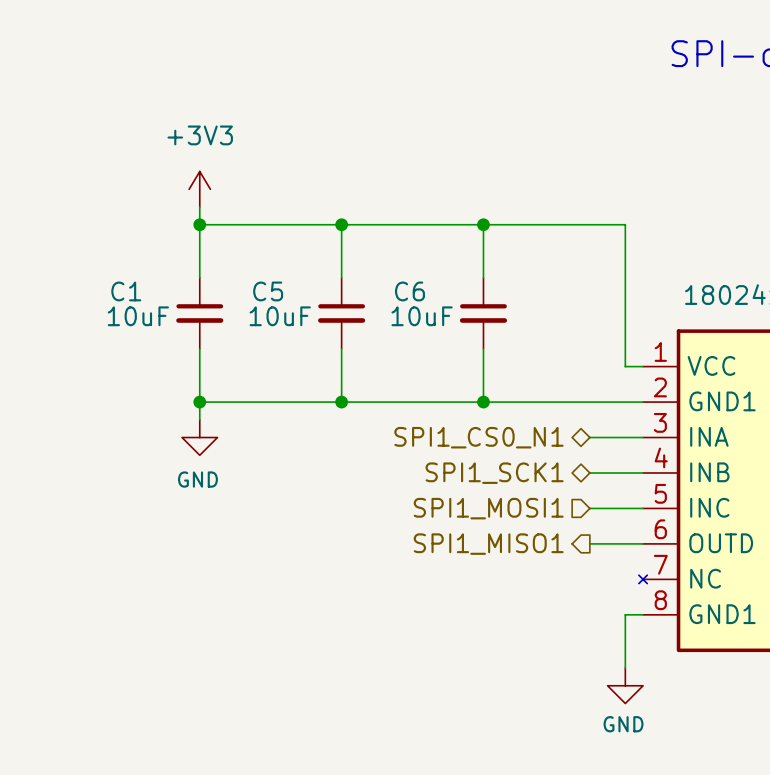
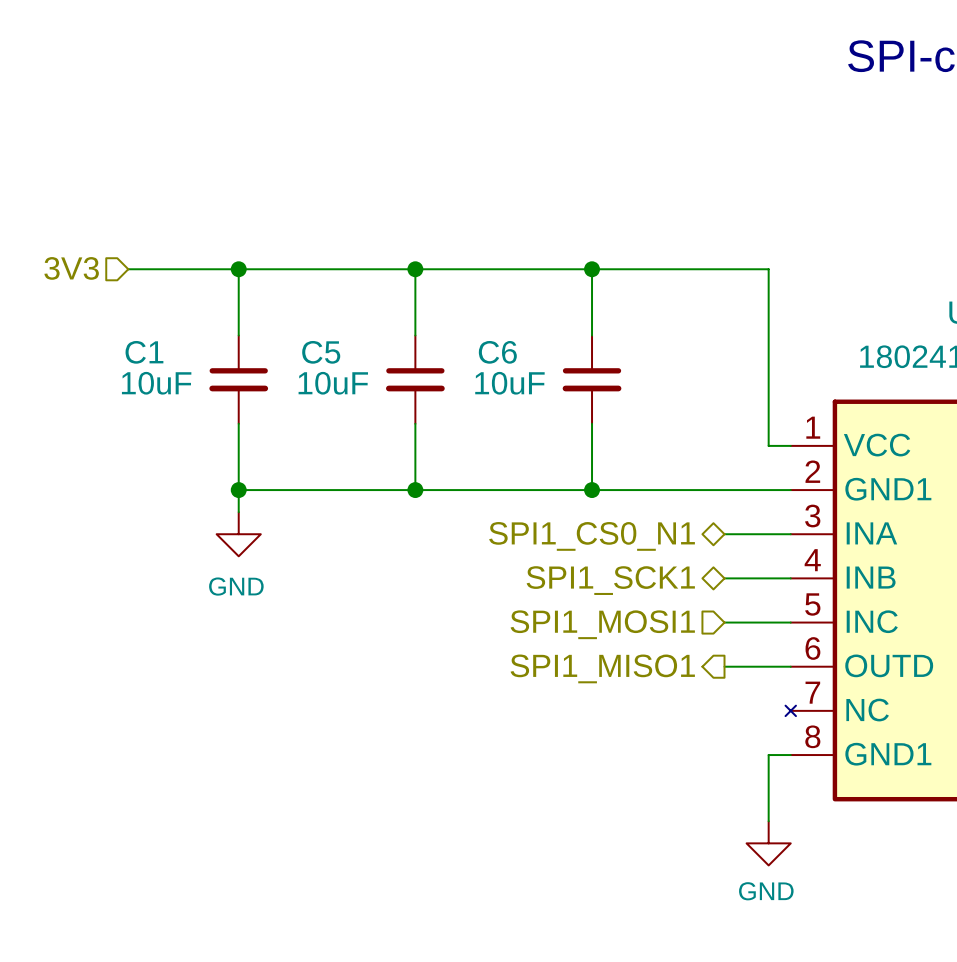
power symbol: +3V3 (199, 189) -> none
wire: (199, 207) (199, 224) -> (128, 269) (238, 269)
hierarchical label: none -> 3V3 (71, 268)

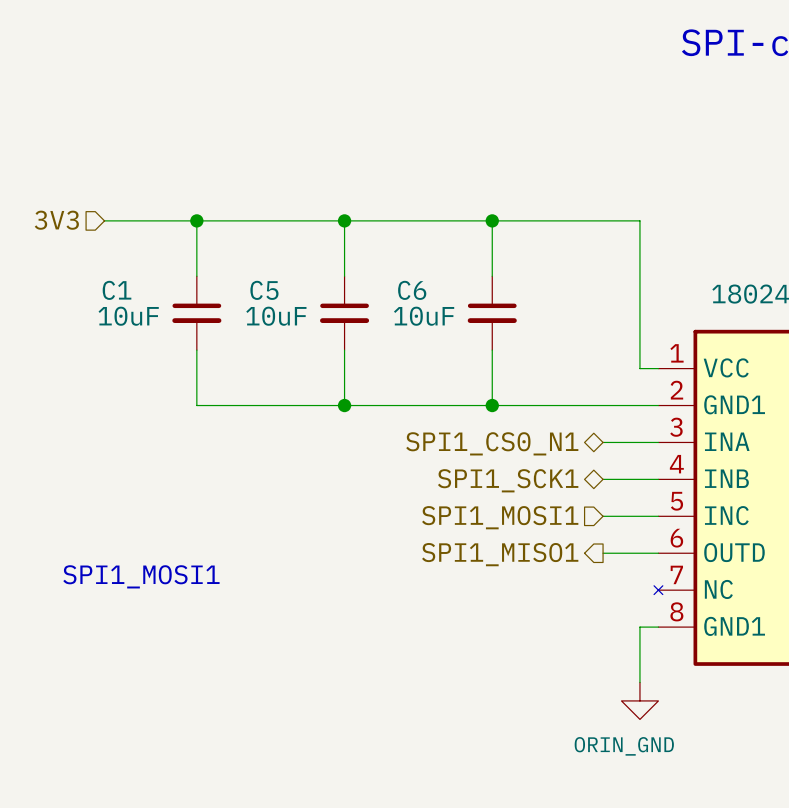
wire: (238, 490) (238, 512) -> none
junction: (238, 490) -> none
power symbol: GND (238, 534) -> none
text: none -> SPI1_MOSI1 (141, 576)
power symbol: GND (768, 843) -> ORIN_GND (639, 700)

